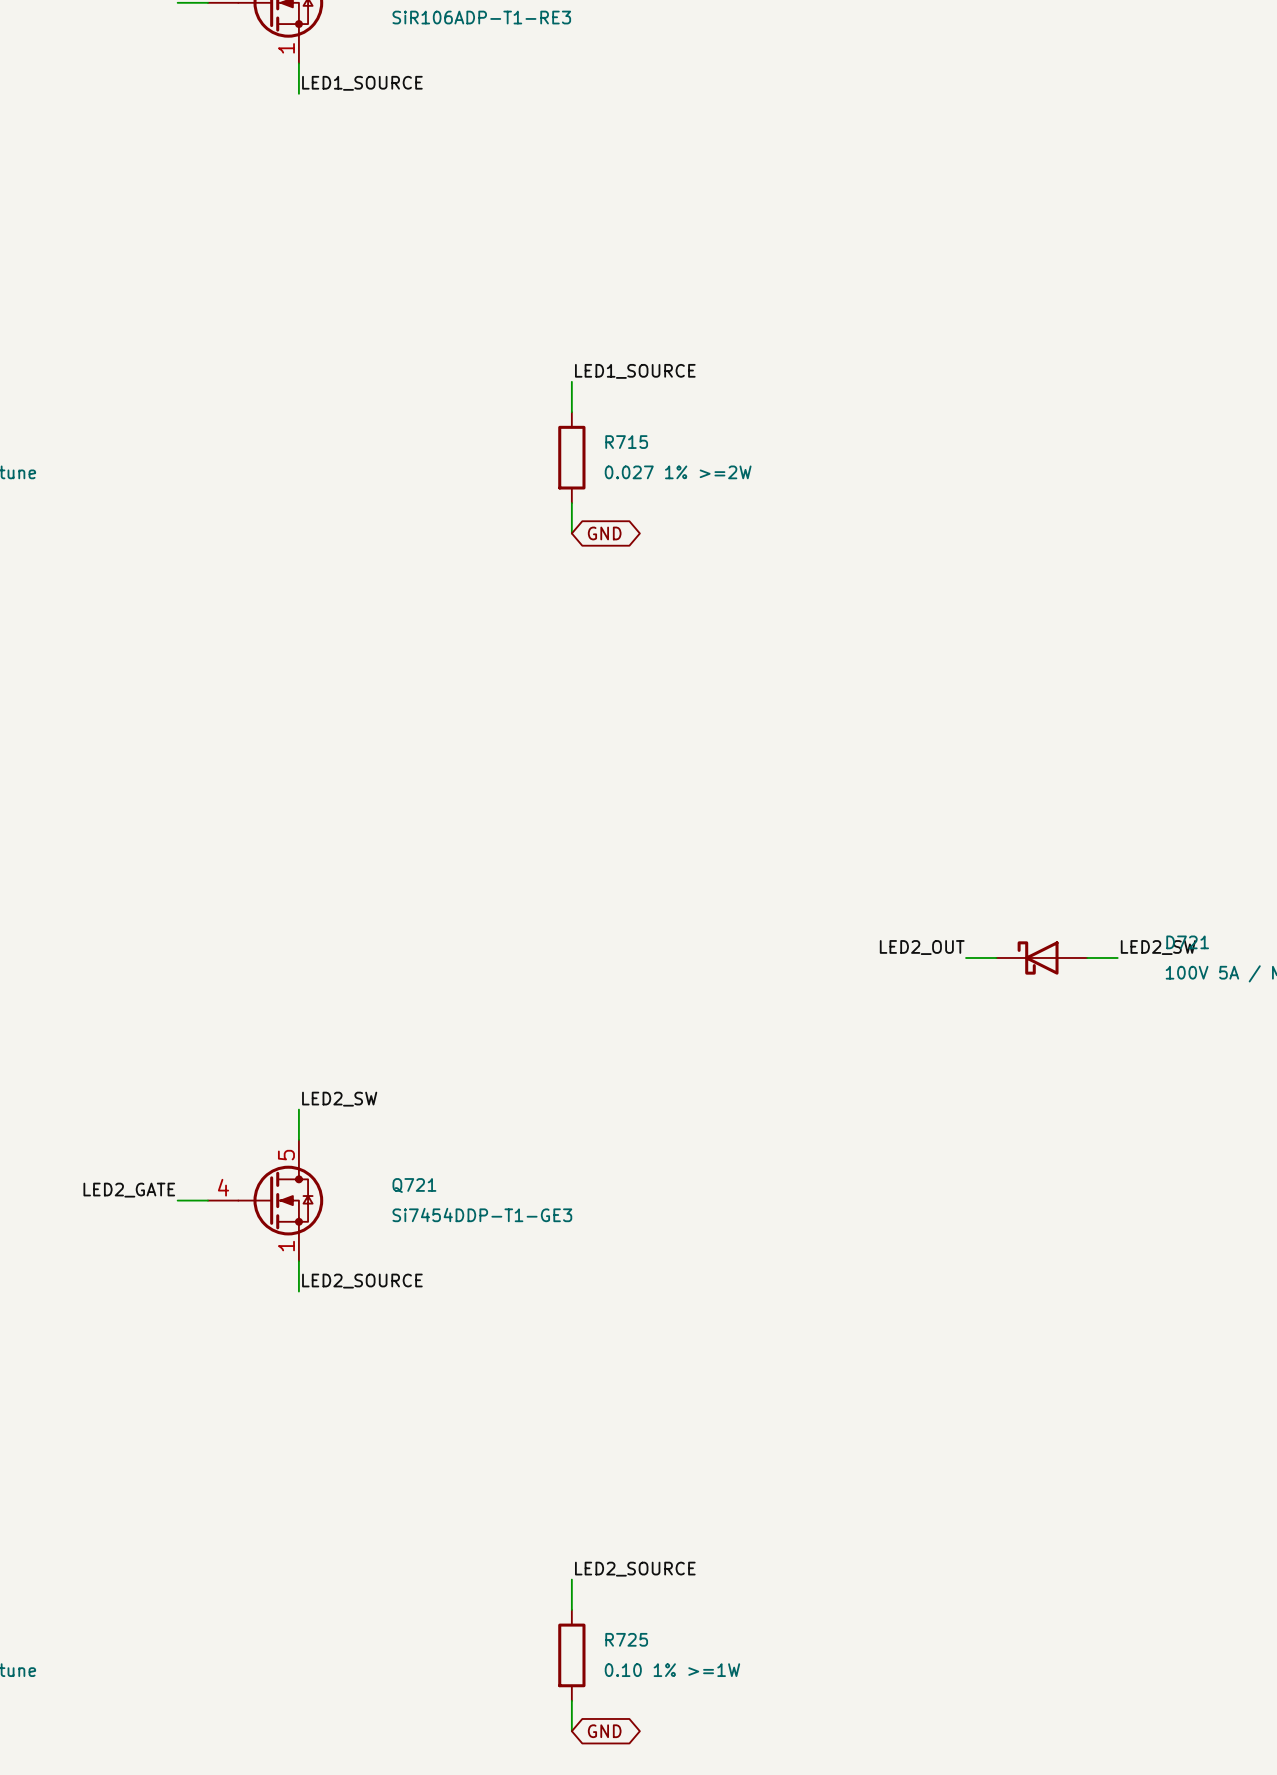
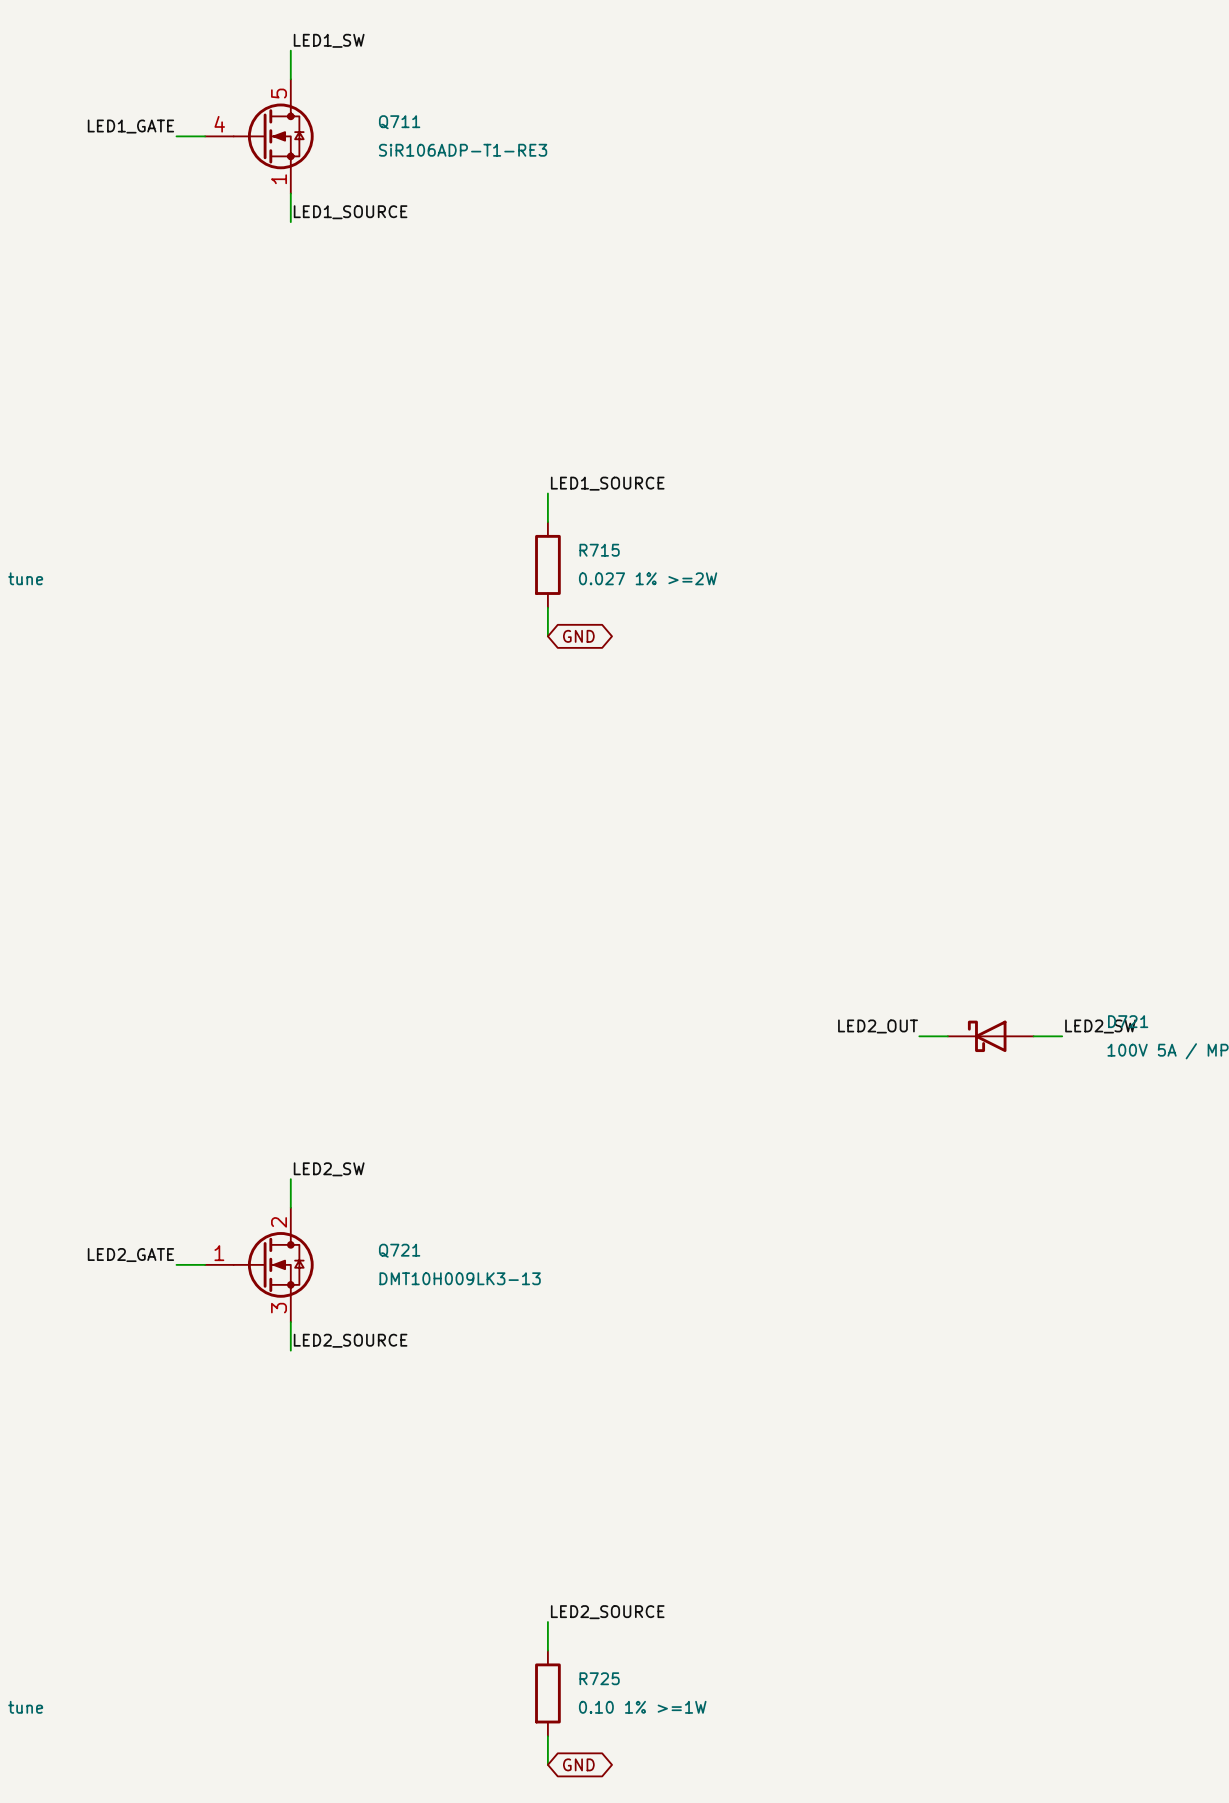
Q721 pin number: 5 (286, 1155) -> 2 (279, 1222)
Q721 pin number: 4 (223, 1187) -> 1 (219, 1253)
Q721 value: Si7454DDP-T1-GE3 (482, 1215) -> DMT10H009LK3-13 (460, 1278)
Q721 pin number: 1 (286, 1246) -> 3 (279, 1308)

